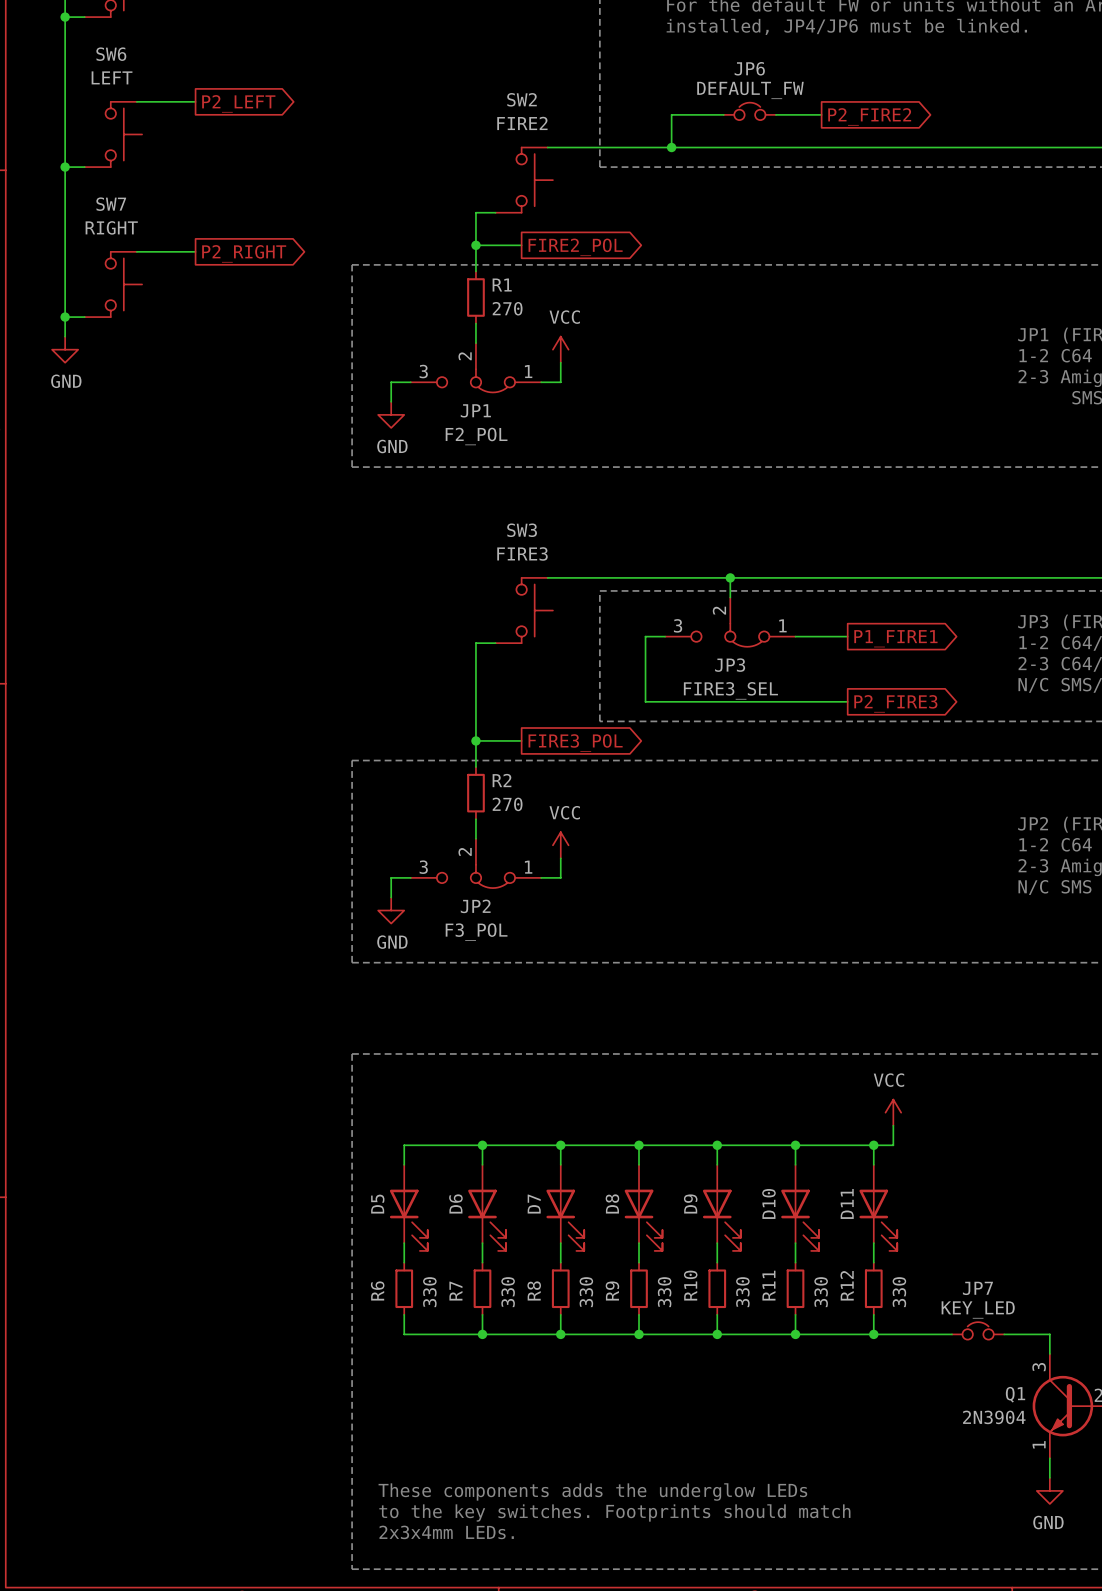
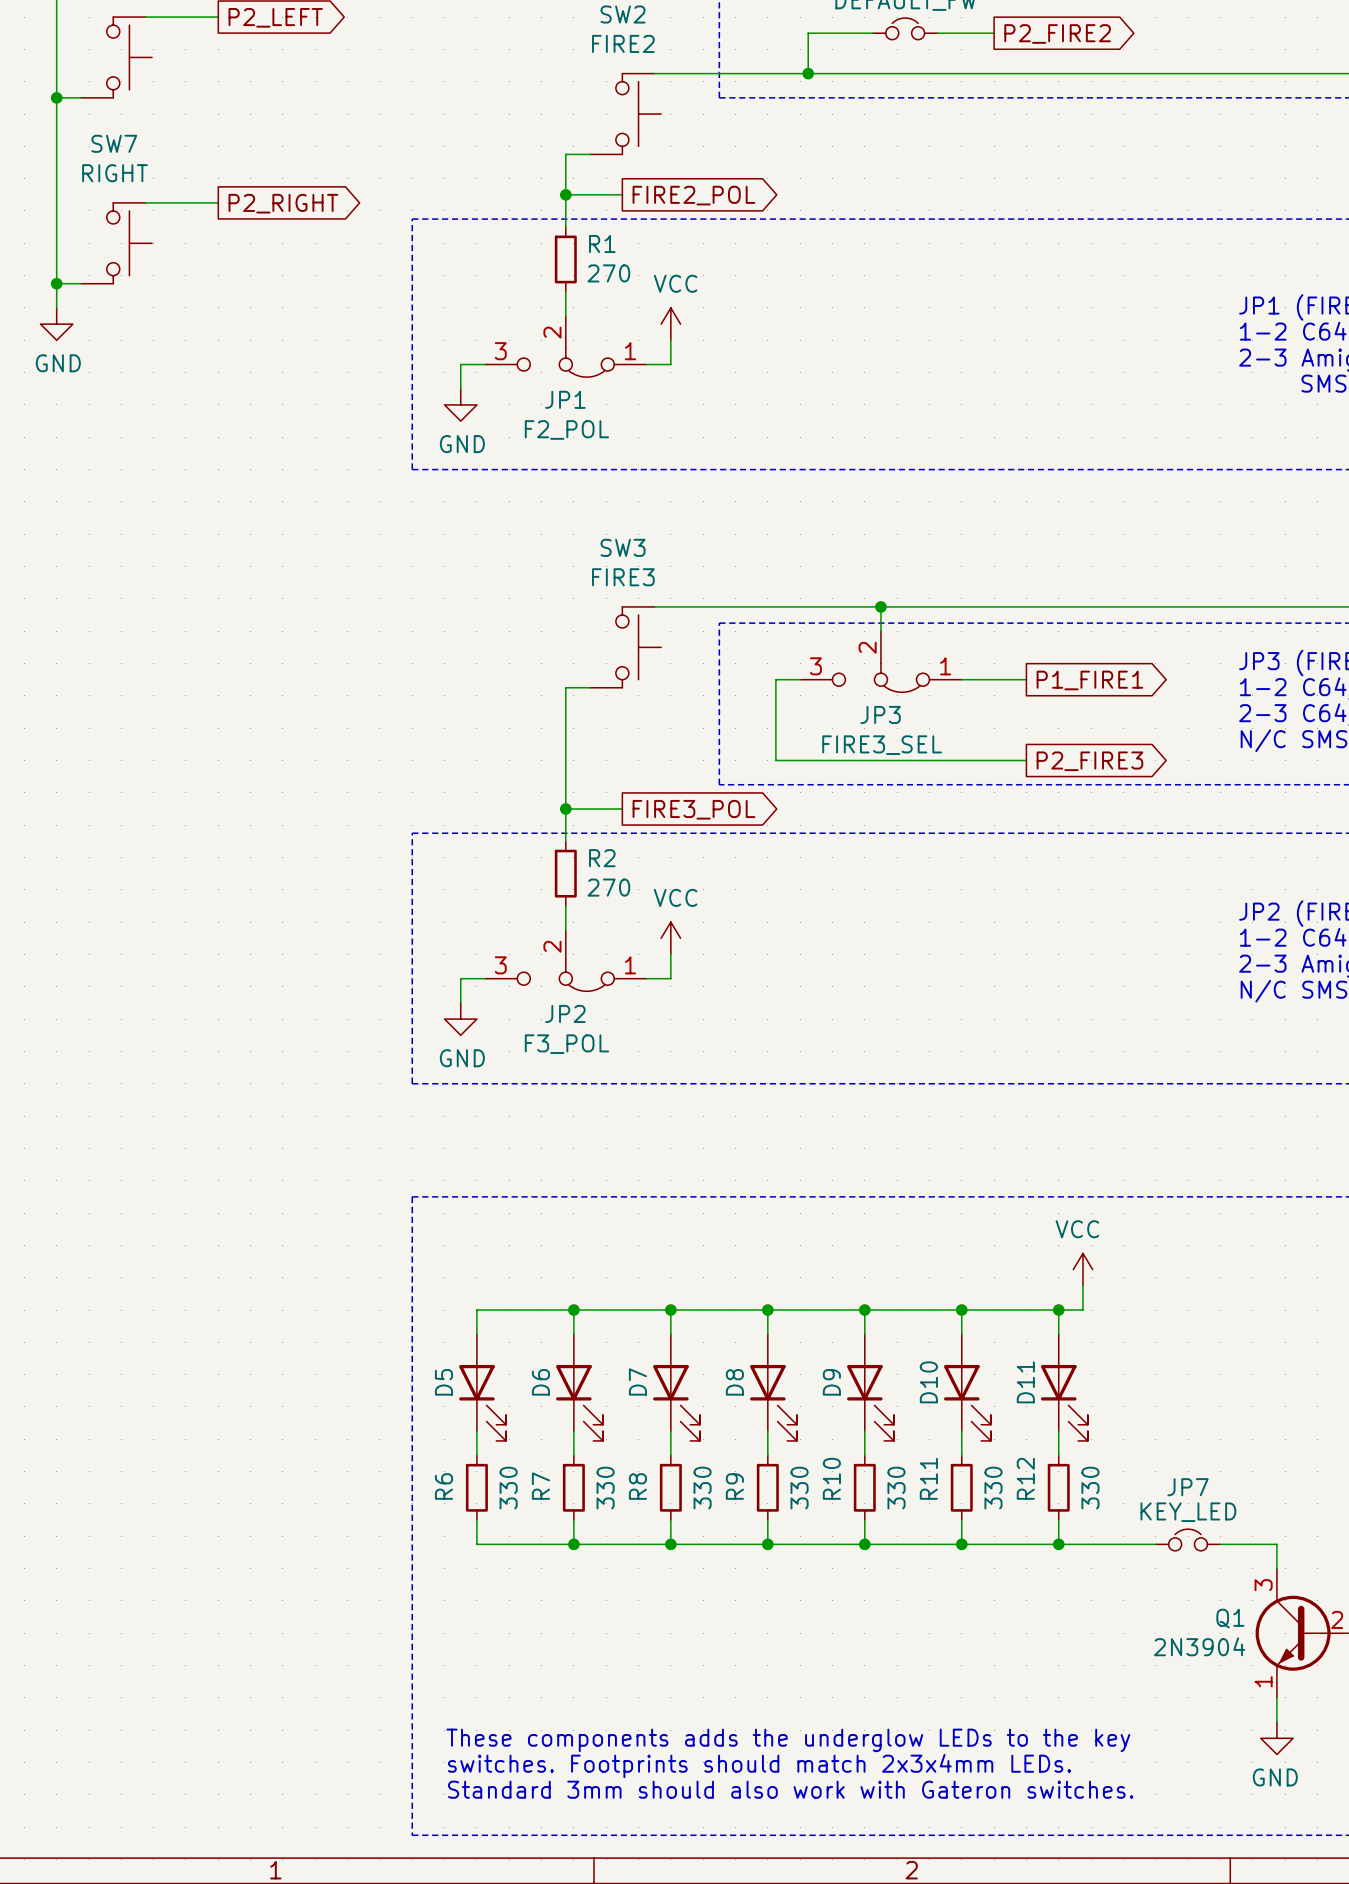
text: These components adds the underglow LEDs (592, 1492) -> These components adds the underglow LEDs to the key (788, 1740)
text: to the key switches. Footprints should match (614, 1512) -> switches. Footprints should match 2x3x4mm LEDs. (759, 1766)
text: 2x3x4mm LEDs. (446, 1532) -> Standard 3mm should also work with Gateron switches. (790, 1789)

